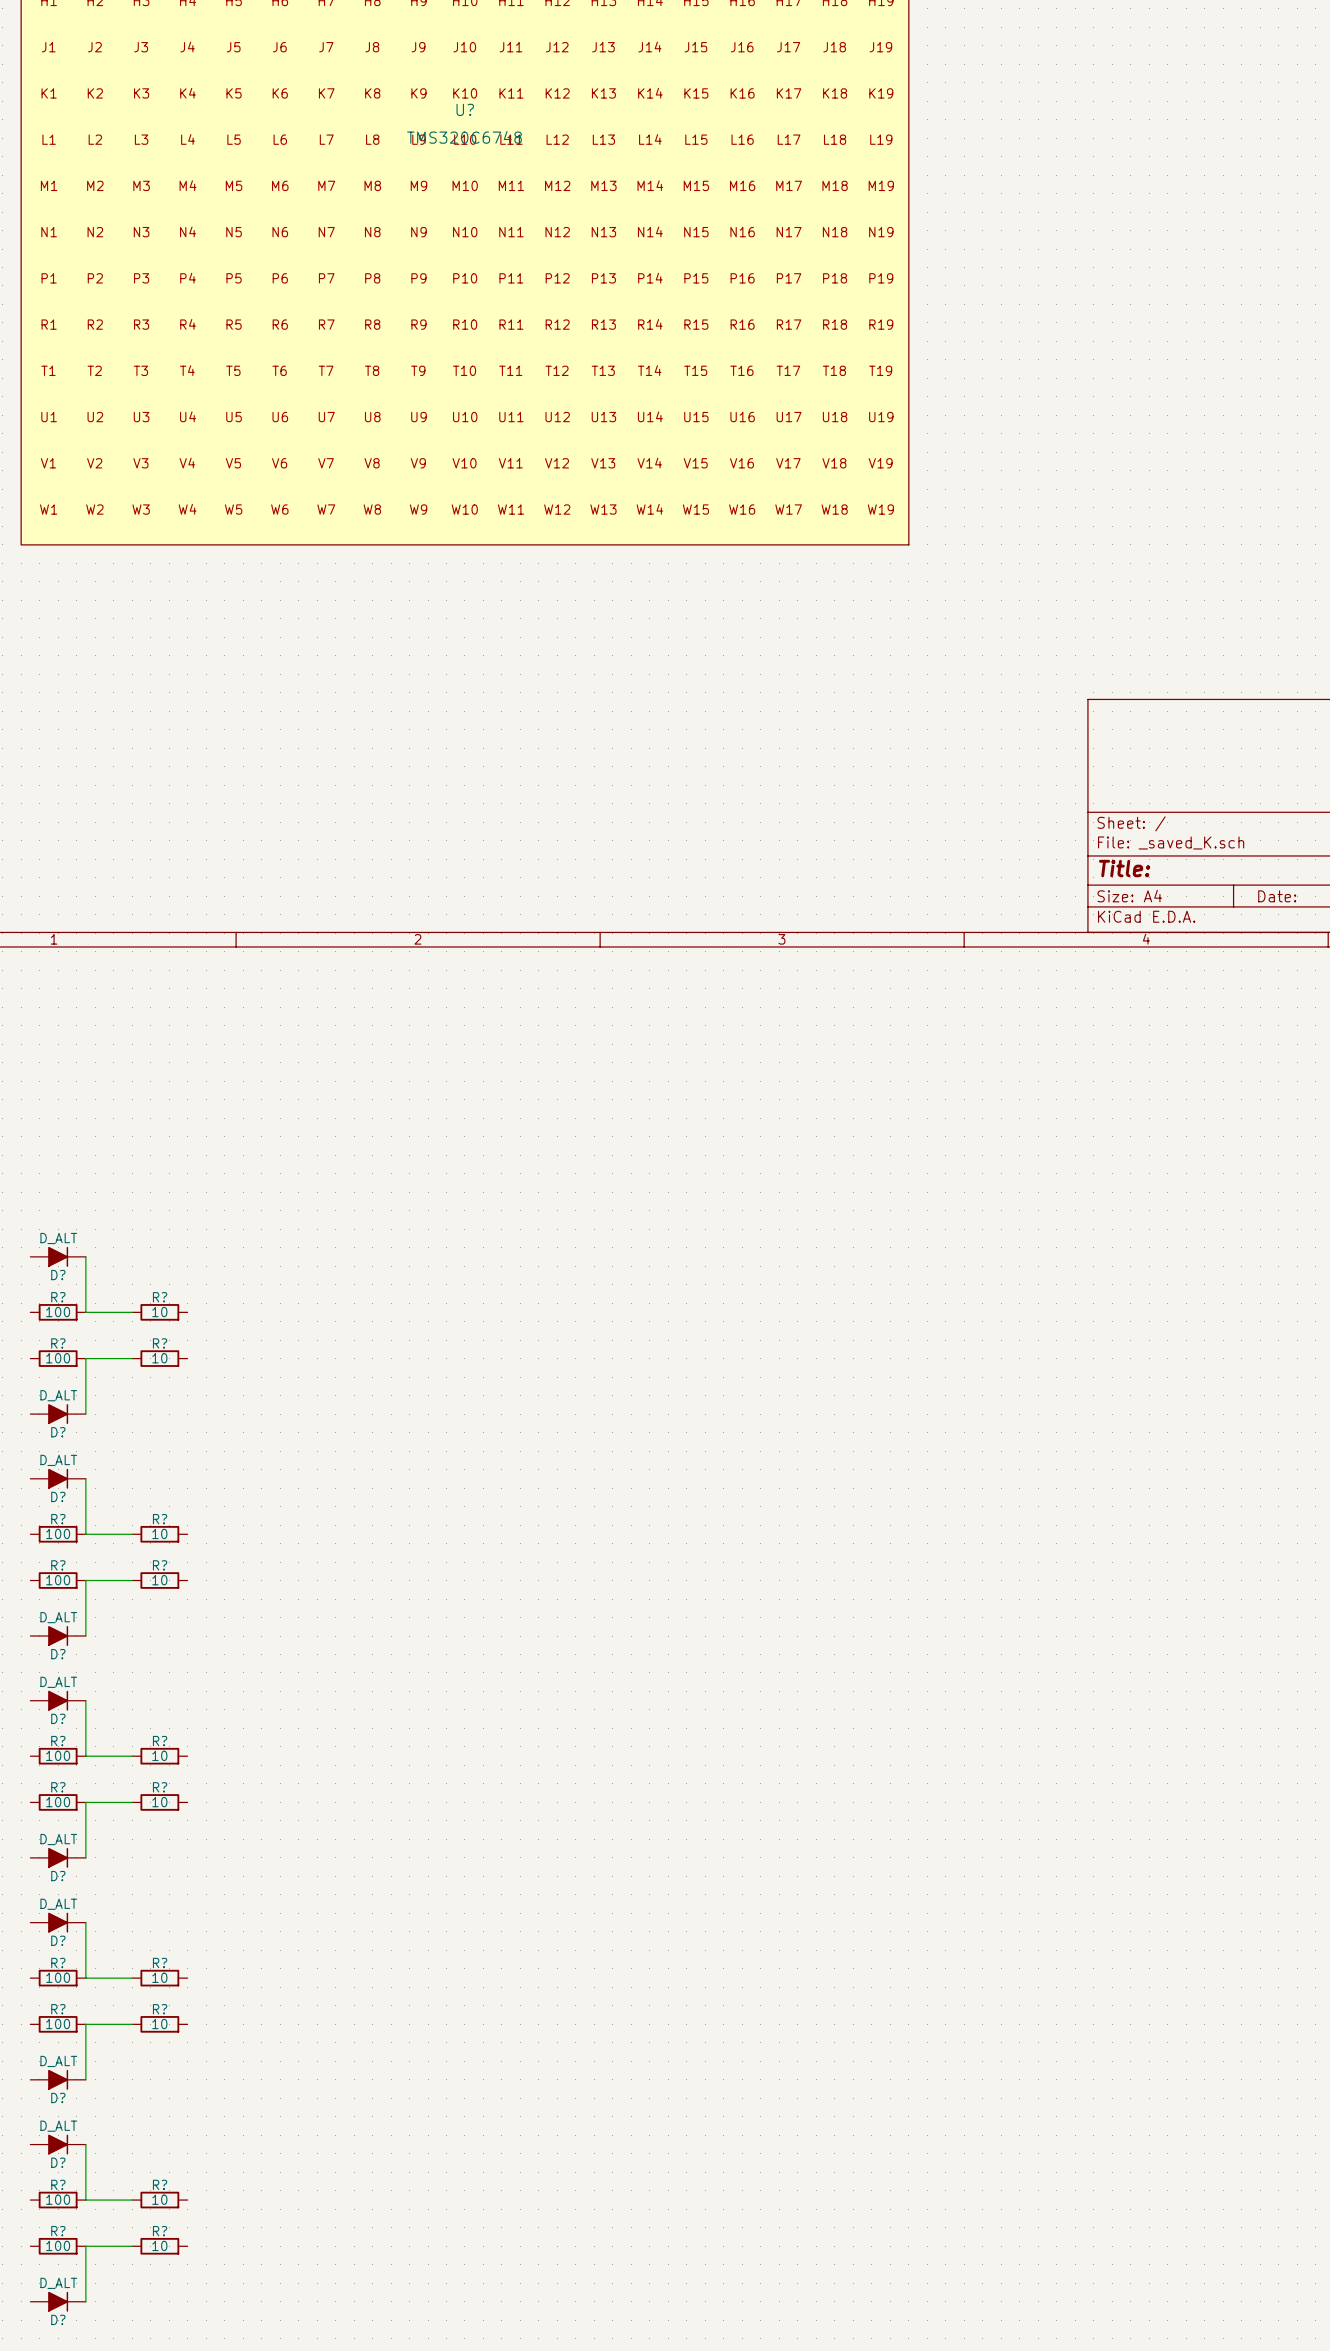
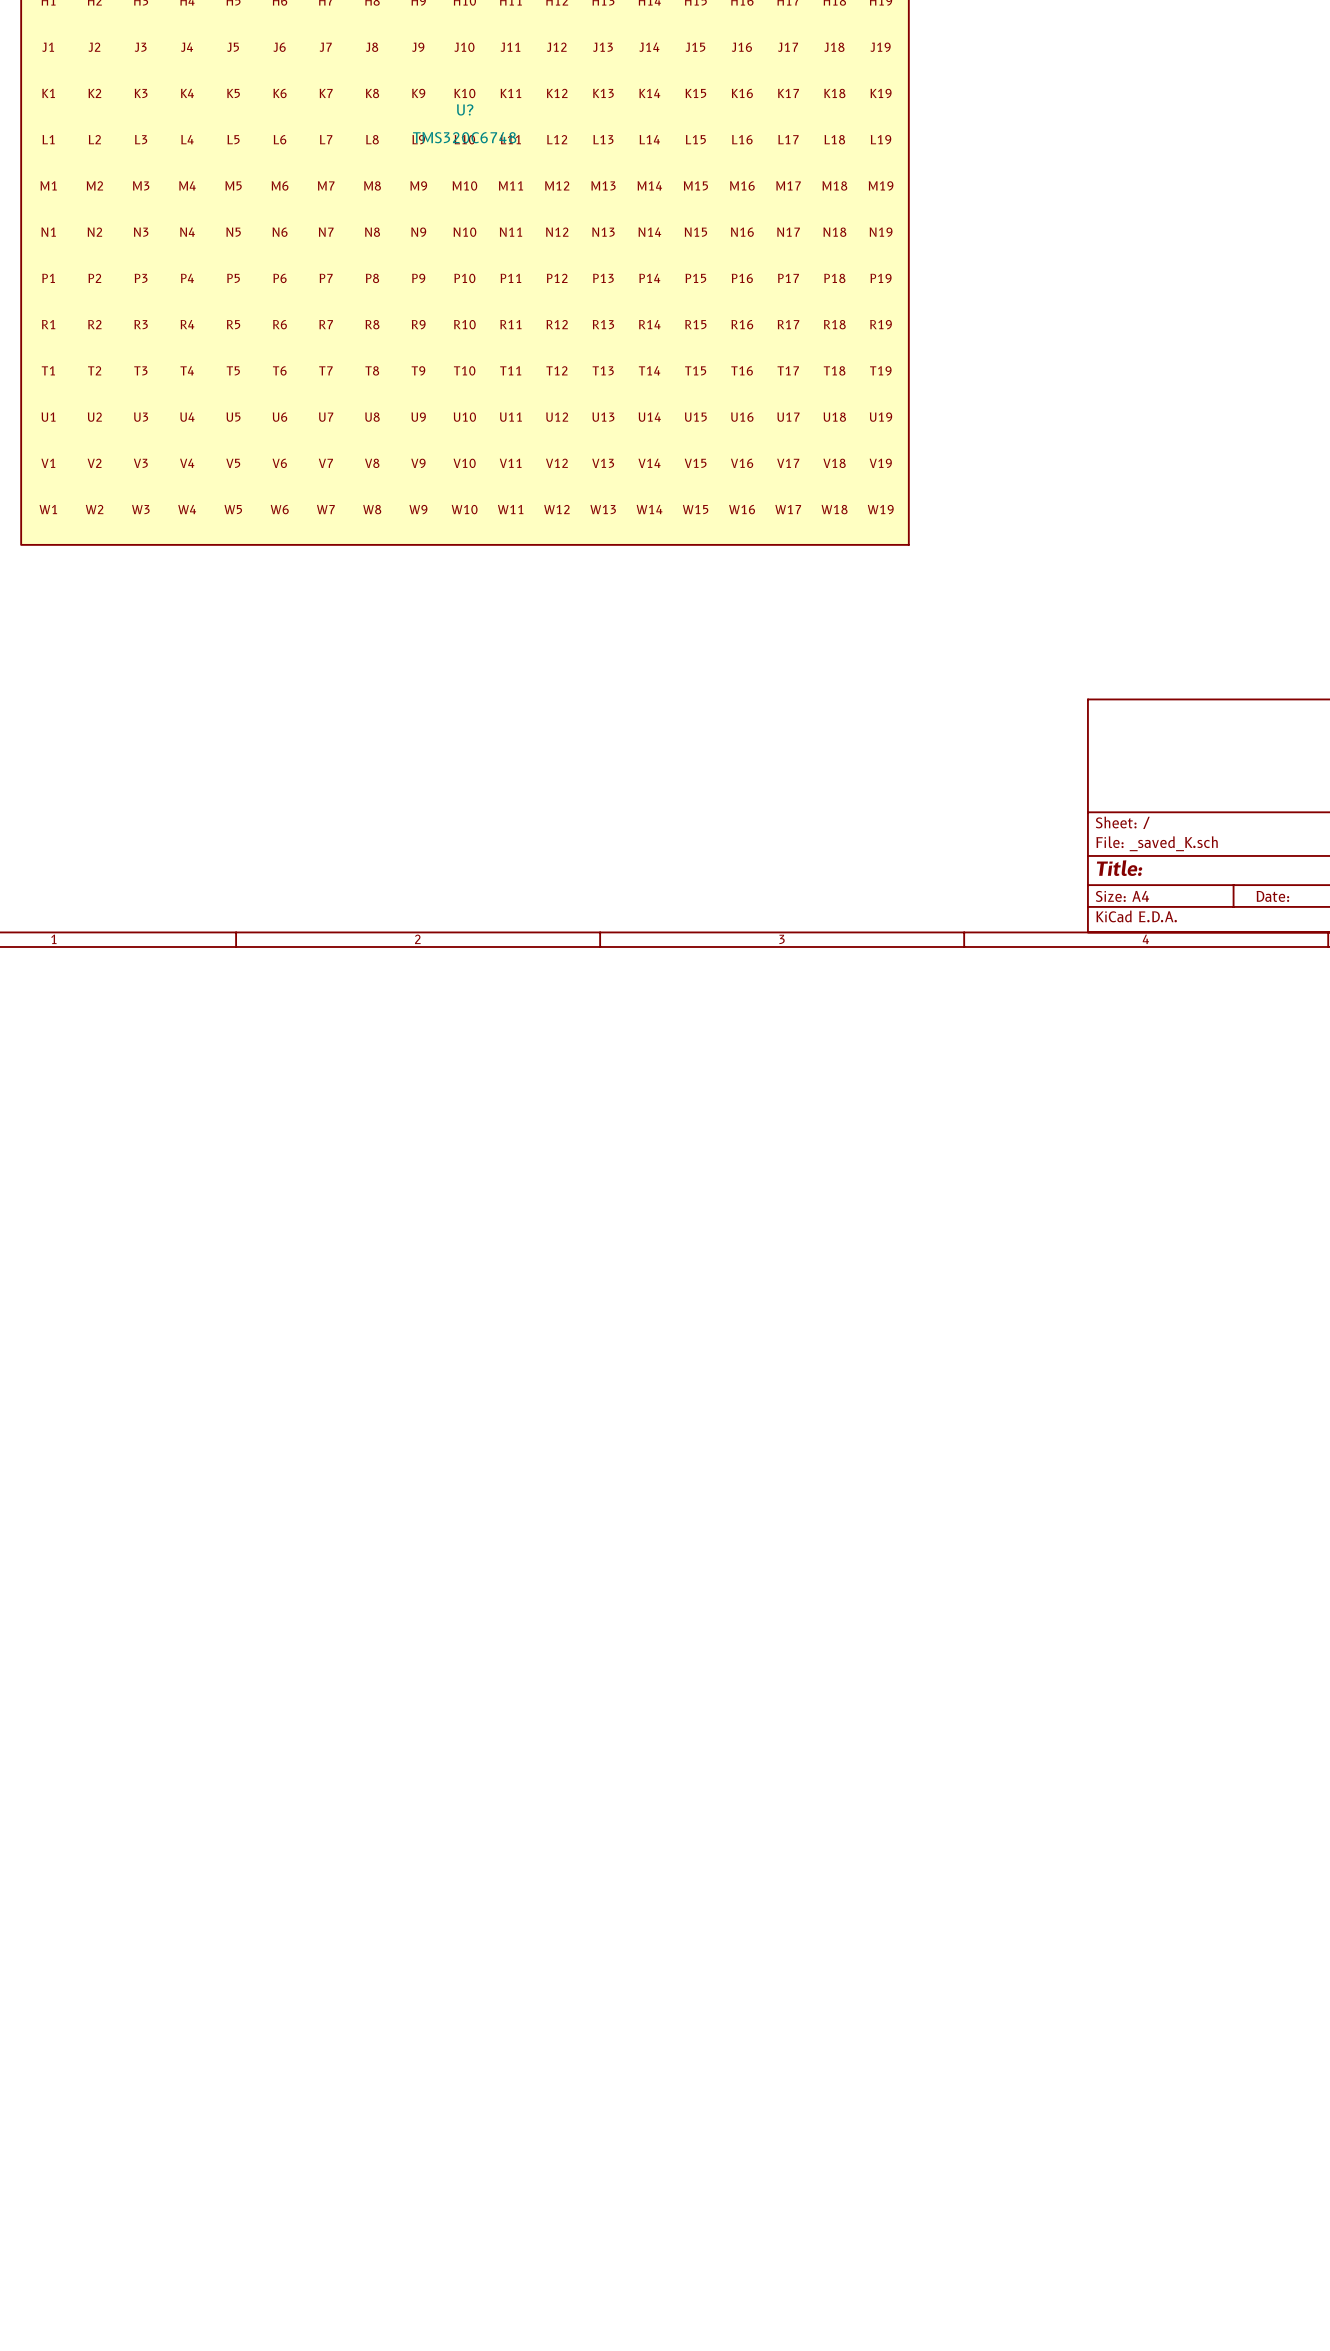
D?: D_ALT (58, 1256) -> none
wire: (85, 1256) (85, 1312) (132, 1312) -> none
R?: 100 (58, 1312) -> none
R?: 10 (159, 1312) -> none
R?: 100 (58, 1358) -> none
wire: (132, 1358) (85, 1358) (85, 1414) -> none
R?: 10 (159, 1358) -> none
D?: D_ALT (58, 1414) -> none
D?: D_ALT (58, 1478) -> none
wire: (85, 1478) (85, 1534) (132, 1534) -> none
R?: 100 (58, 1534) -> none
R?: 10 (159, 1534) -> none
R?: 100 (58, 1580) -> none
wire: (132, 1580) (85, 1580) (85, 1636) -> none
R?: 10 (159, 1580) -> none
D?: D_ALT (58, 1636) -> none
D?: D_ALT (58, 1700) -> none
wire: (85, 1700) (85, 1756) (132, 1756) -> none
R?: 100 (58, 1756) -> none
R?: 10 (159, 1756) -> none
R?: 100 (58, 1802) -> none
wire: (132, 1802) (85, 1802) (85, 1857) -> none
R?: 10 (159, 1802) -> none
D?: D_ALT (58, 1857) -> none
D?: D_ALT (58, 1922) -> none
wire: (85, 1922) (85, 1978) (132, 1978) -> none
R?: 100 (58, 1978) -> none
R?: 10 (159, 1978) -> none
R?: 100 (58, 2024) -> none
wire: (132, 2024) (85, 2024) (85, 2079) -> none
R?: 10 (159, 2024) -> none
D?: D_ALT (58, 2079) -> none
D?: D_ALT (58, 2144) -> none
wire: (85, 2144) (85, 2200) (132, 2200) -> none
R?: 100 (58, 2200) -> none
R?: 10 (159, 2200) -> none
R?: 100 (58, 2246) -> none
wire: (132, 2246) (85, 2246) (85, 2301) -> none
R?: 10 (159, 2246) -> none
D?: D_ALT (58, 2301) -> none

